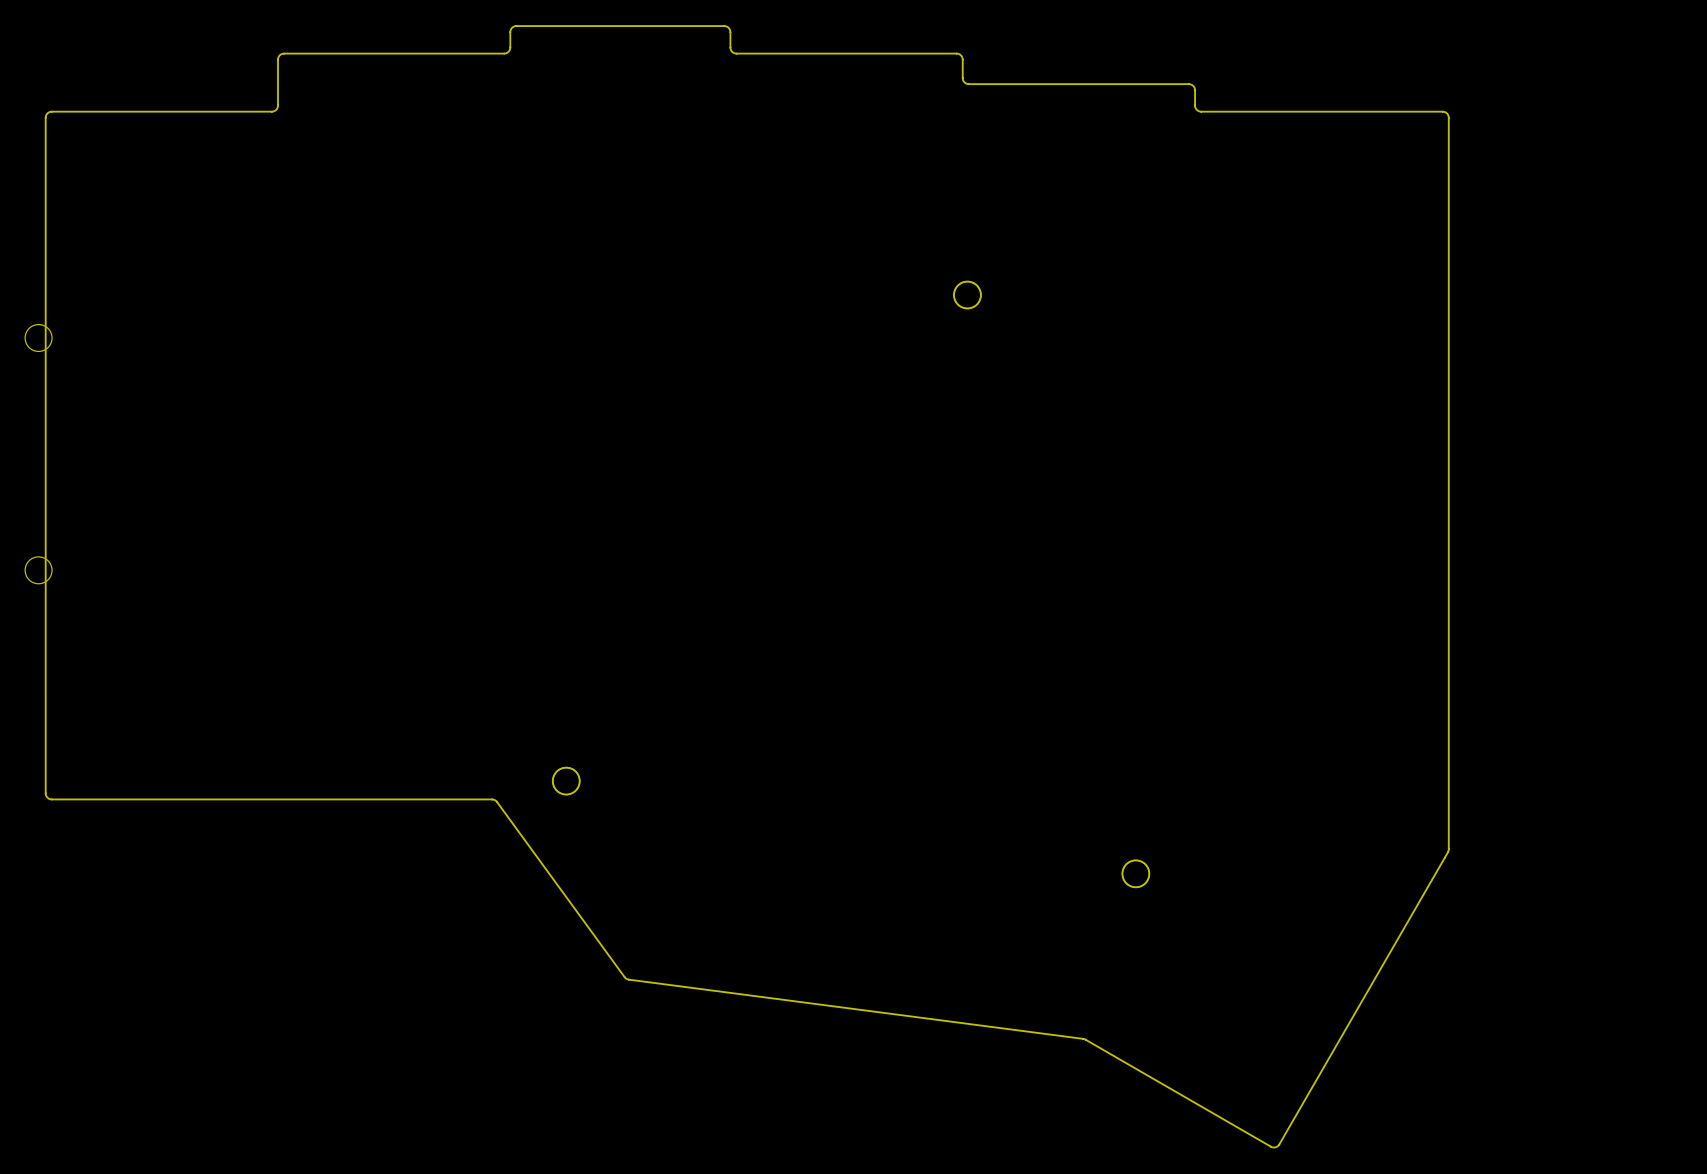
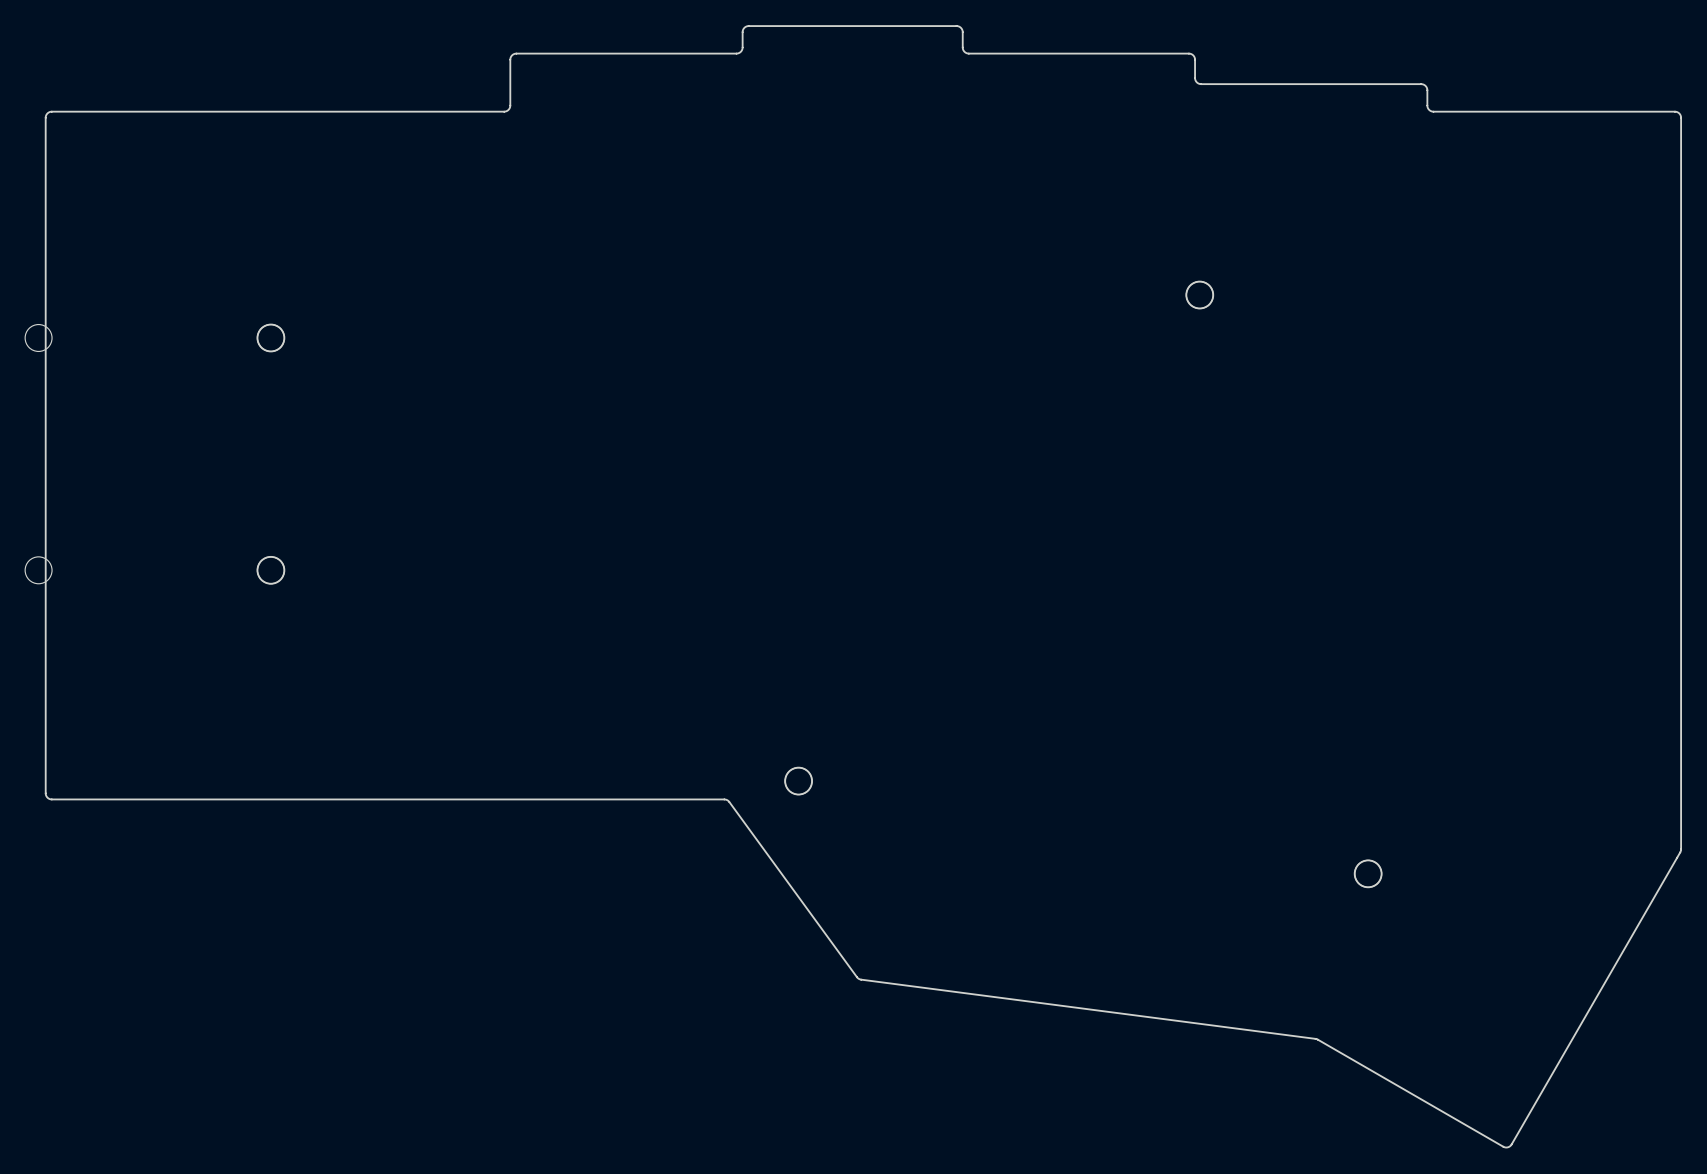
board edge: (271, 111) (276, 109) (277, 106) (278, 59) (282, 53) (504, 53) (510, 48) (510, 30) (515, 26) (724, 26) (729, 29) (730, 48) (735, 53) (957, 53) (962, 58) (963, 80) (968, 84) (1189, 84) (1194, 88) (1195, 107) (1201, 111) (1433, 111) -> (271, 111) (504, 111) (510, 106) (510, 58) (515, 53) (736, 53) (742, 49) (742, 30) (747, 26) (956, 26) (962, 29) (962, 49) (968, 53) (1189, 53) (1194, 58) (1195, 78) (1199, 83) (1422, 84) (1427, 88) (1427, 107) (1433, 111)
board edge: (1442, 111) (1446, 113) (1448, 117) (1448, 850) (1277, 1146) (1270, 1146) (1083, 1038) (627, 979) (496, 801) (492, 799) -> (1442, 111) (1674, 111) (1679, 113) (1681, 117) (1681, 850) (1509, 1146) (1503, 1146) (1316, 1038) (859, 979) (726, 799) (492, 799)
round board edge position: (967, 295) -> (1199, 295)
round board edge: none -> [256, 323, 286, 353]
round board edge: none -> [256, 555, 286, 585]
round board edge: [551, 766, 581, 796] -> none
round board edge: none -> [784, 766, 813, 796]
round board edge: [1121, 859, 1151, 889] -> none
round board edge: none -> [1353, 859, 1383, 889]

